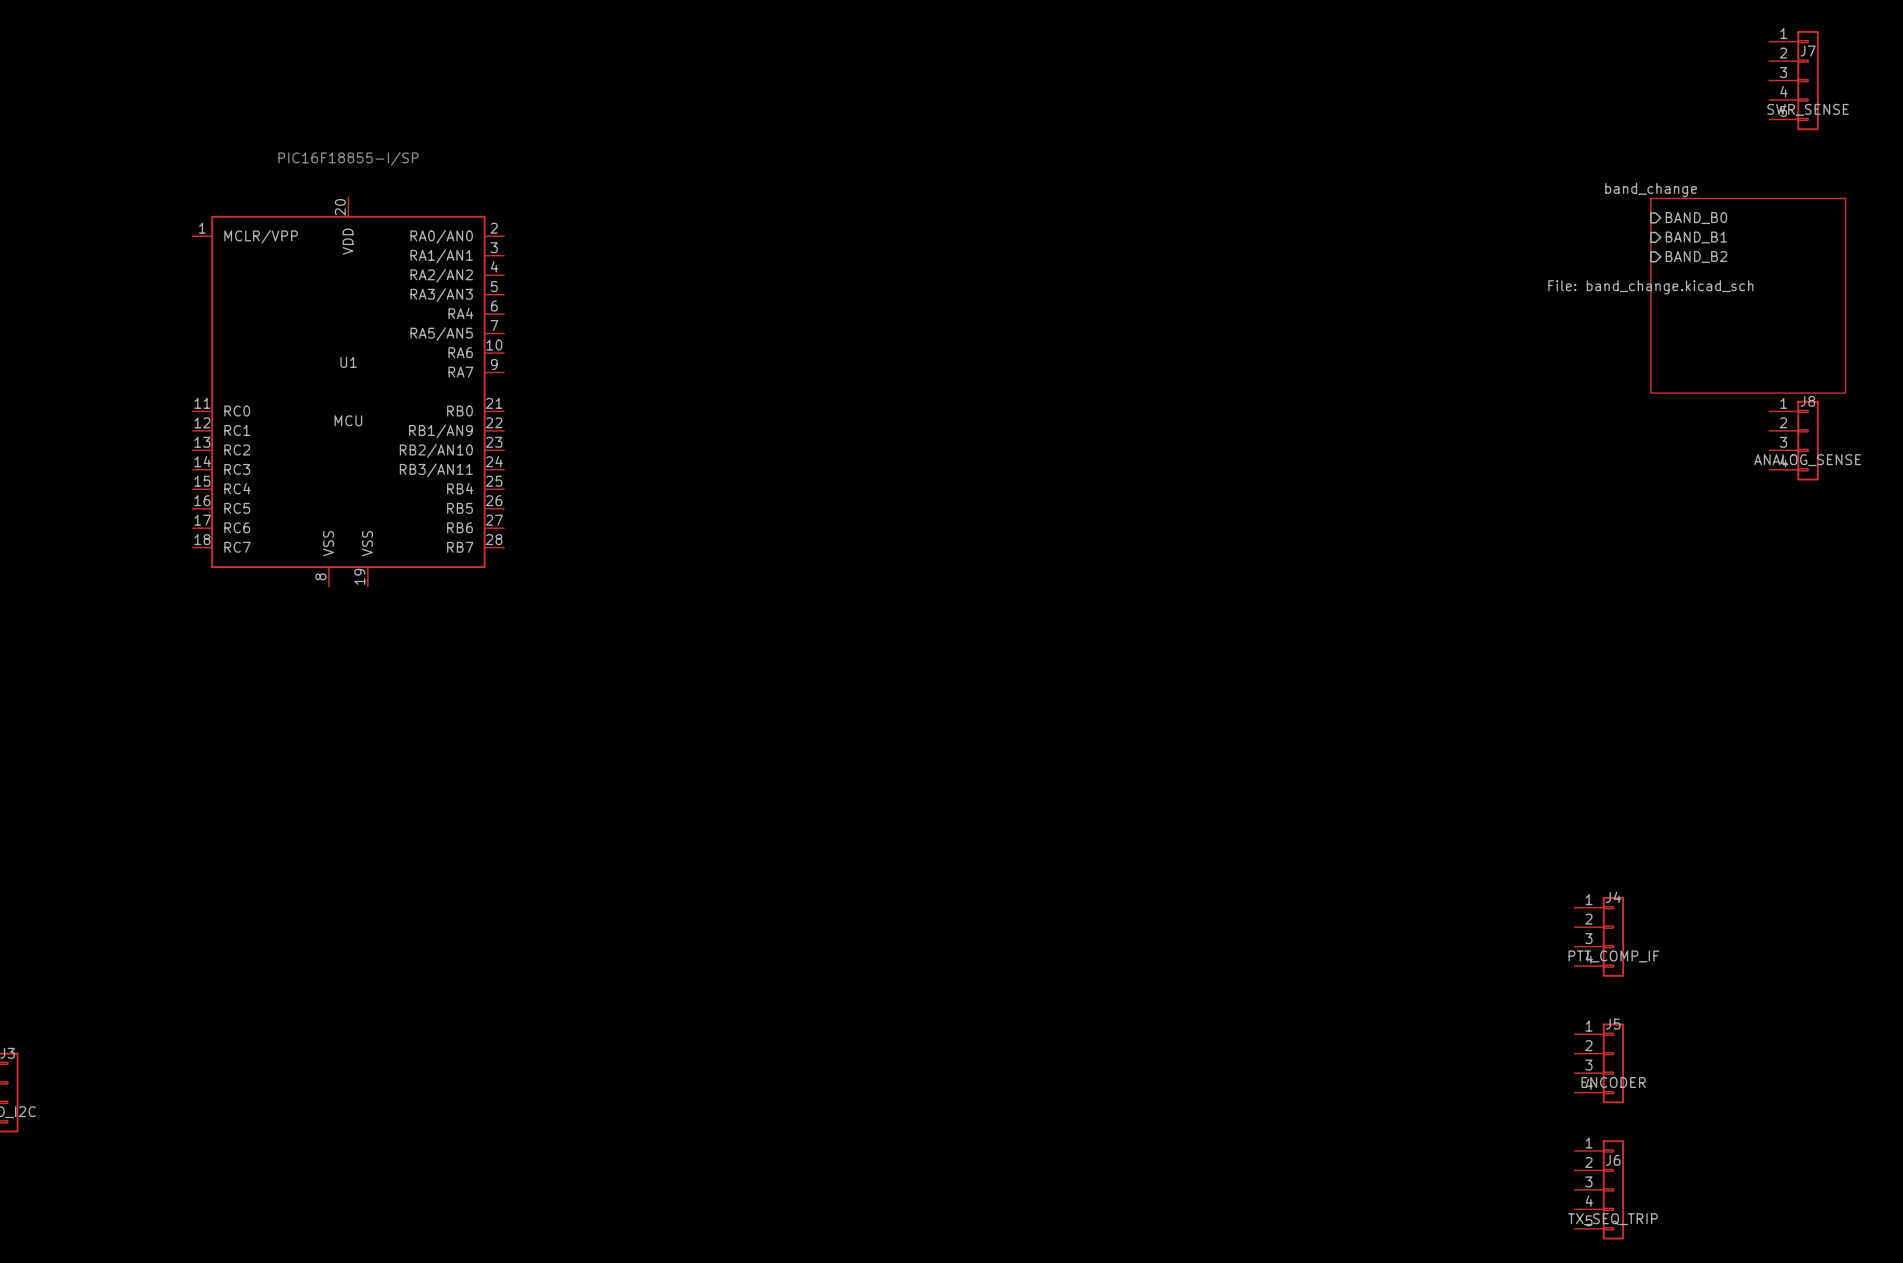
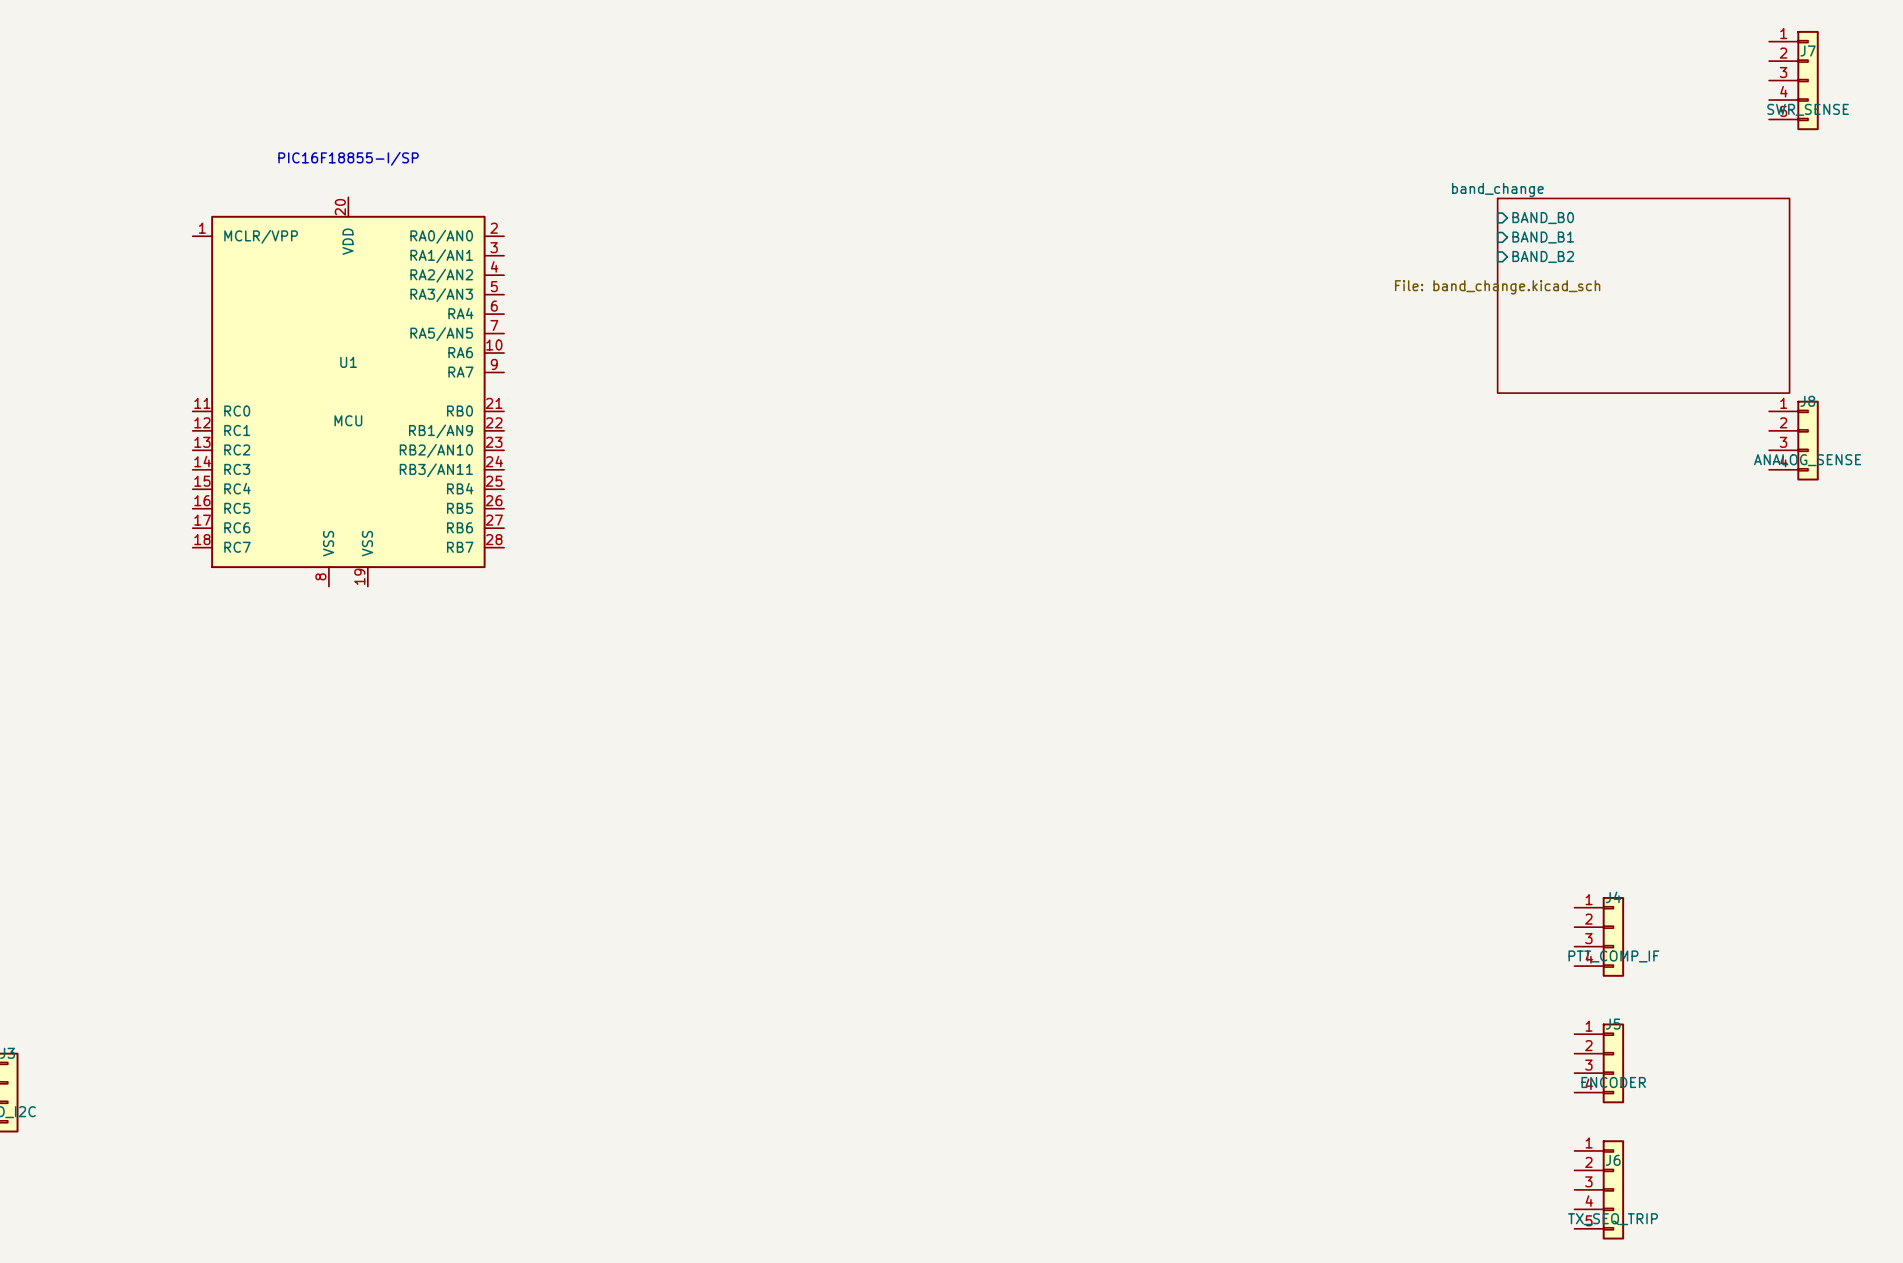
sheet pin position: BAND_B0 (1696, 218) -> BAND_B0 (1543, 218)
sheet pin position: BAND_B1 (1696, 237) -> BAND_B1 (1543, 237)
sheet pin position: BAND_B2 (1696, 256) -> BAND_B2 (1543, 256)
sheet band_change: none -> File: band_change.kicad_sch (1643, 295)
sheet band_change: File: band_change.kicad_sch (1748, 295) -> none

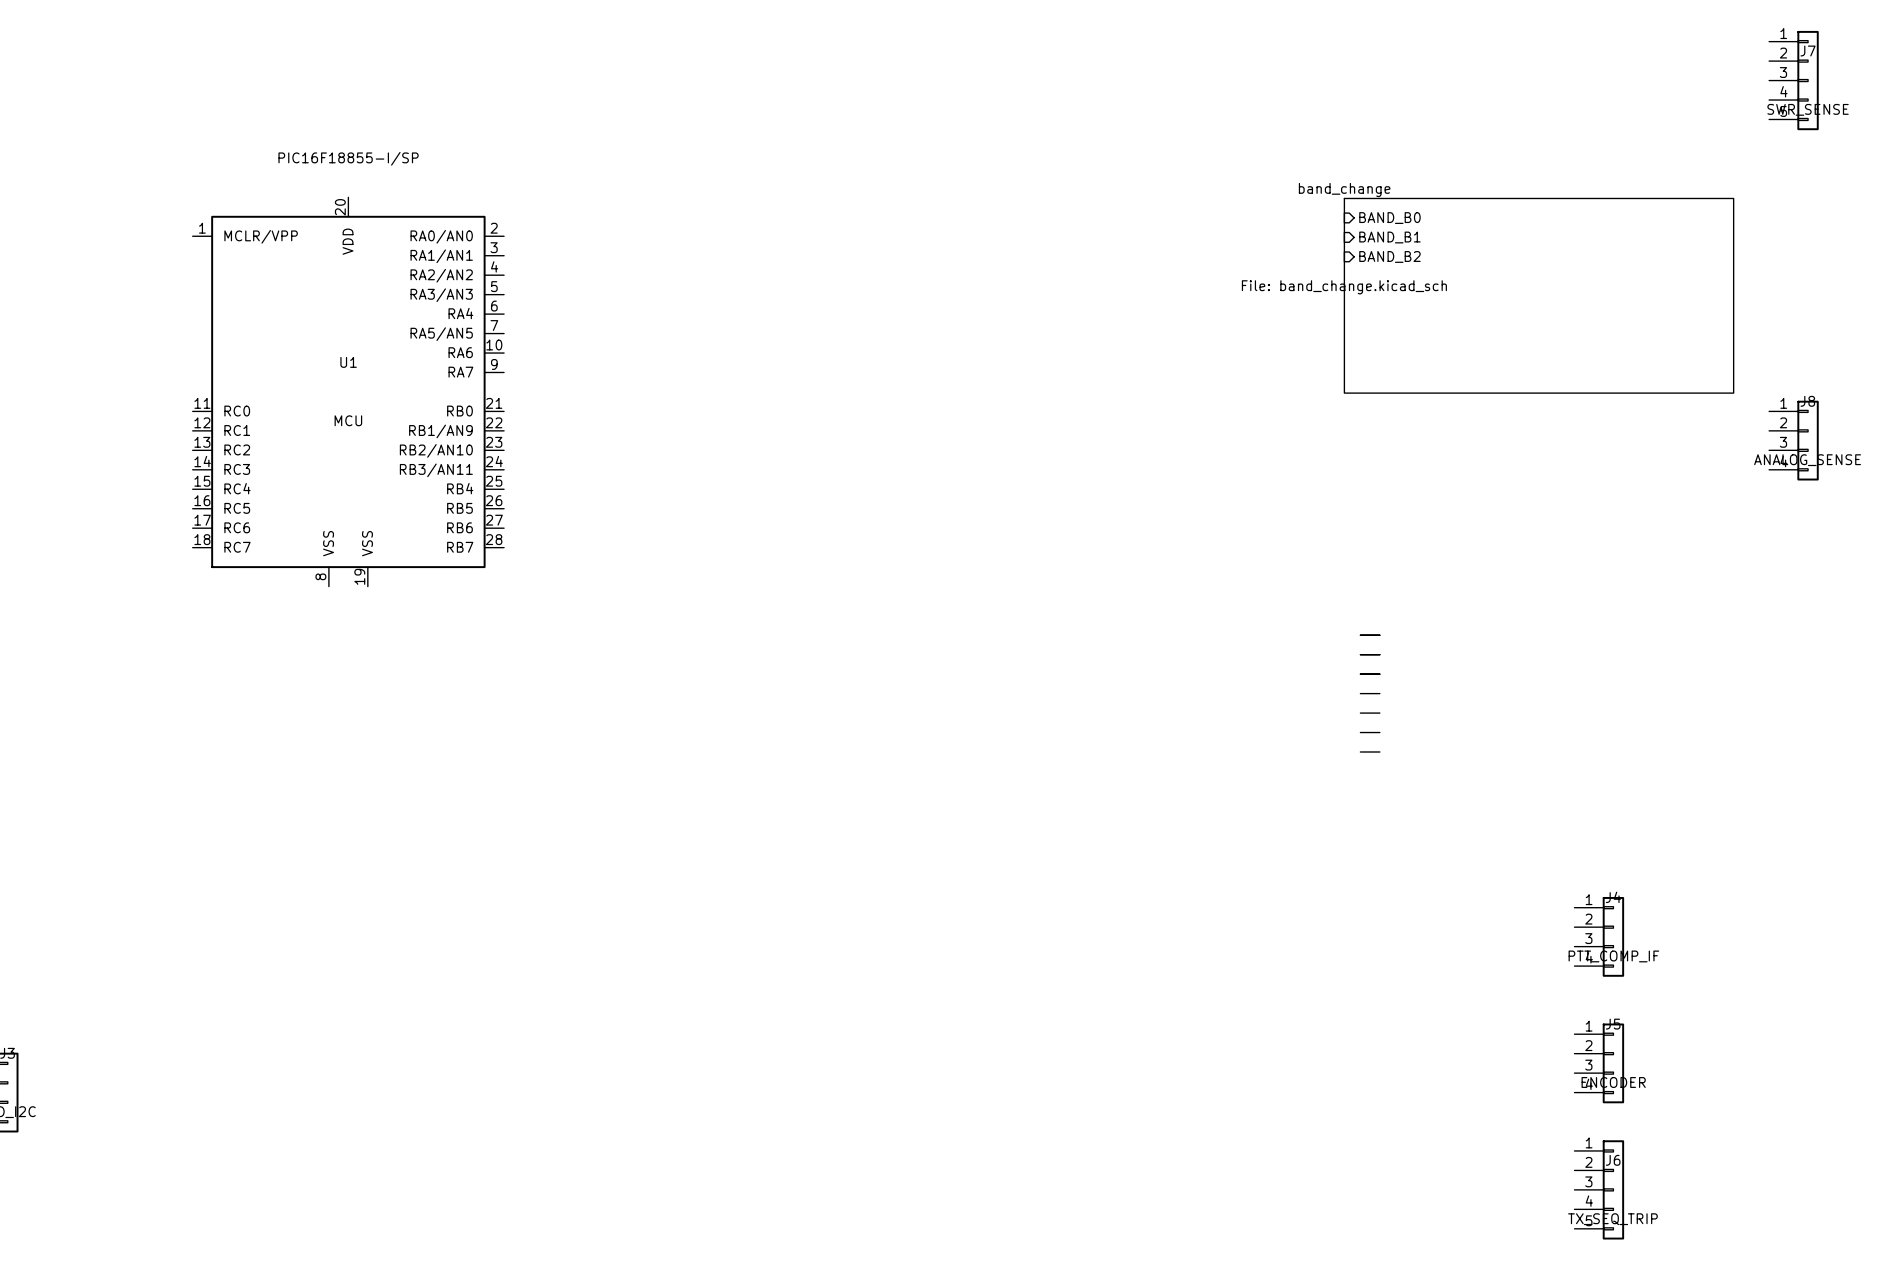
sheet pin position: BAND_B0 (1543, 218) -> BAND_B0 (1389, 218)
sheet pin position: BAND_B1 (1543, 237) -> BAND_B1 (1389, 237)
sheet pin position: BAND_B2 (1543, 256) -> BAND_B2 (1389, 256)
sheet band_change: none -> File: band_change.kicad_sch (1539, 295)
sheet band_change: File: band_change.kicad_sch (1643, 295) -> none
wire: none -> (1360, 635) (1379, 635)
wire: none -> (1360, 654) (1379, 654)
wire: none -> (1360, 674) (1379, 674)
wire: none -> (1360, 693) (1379, 693)
wire: none -> (1360, 713) (1379, 713)
wire: none -> (1360, 732) (1379, 732)
wire: none -> (1360, 752) (1379, 752)

